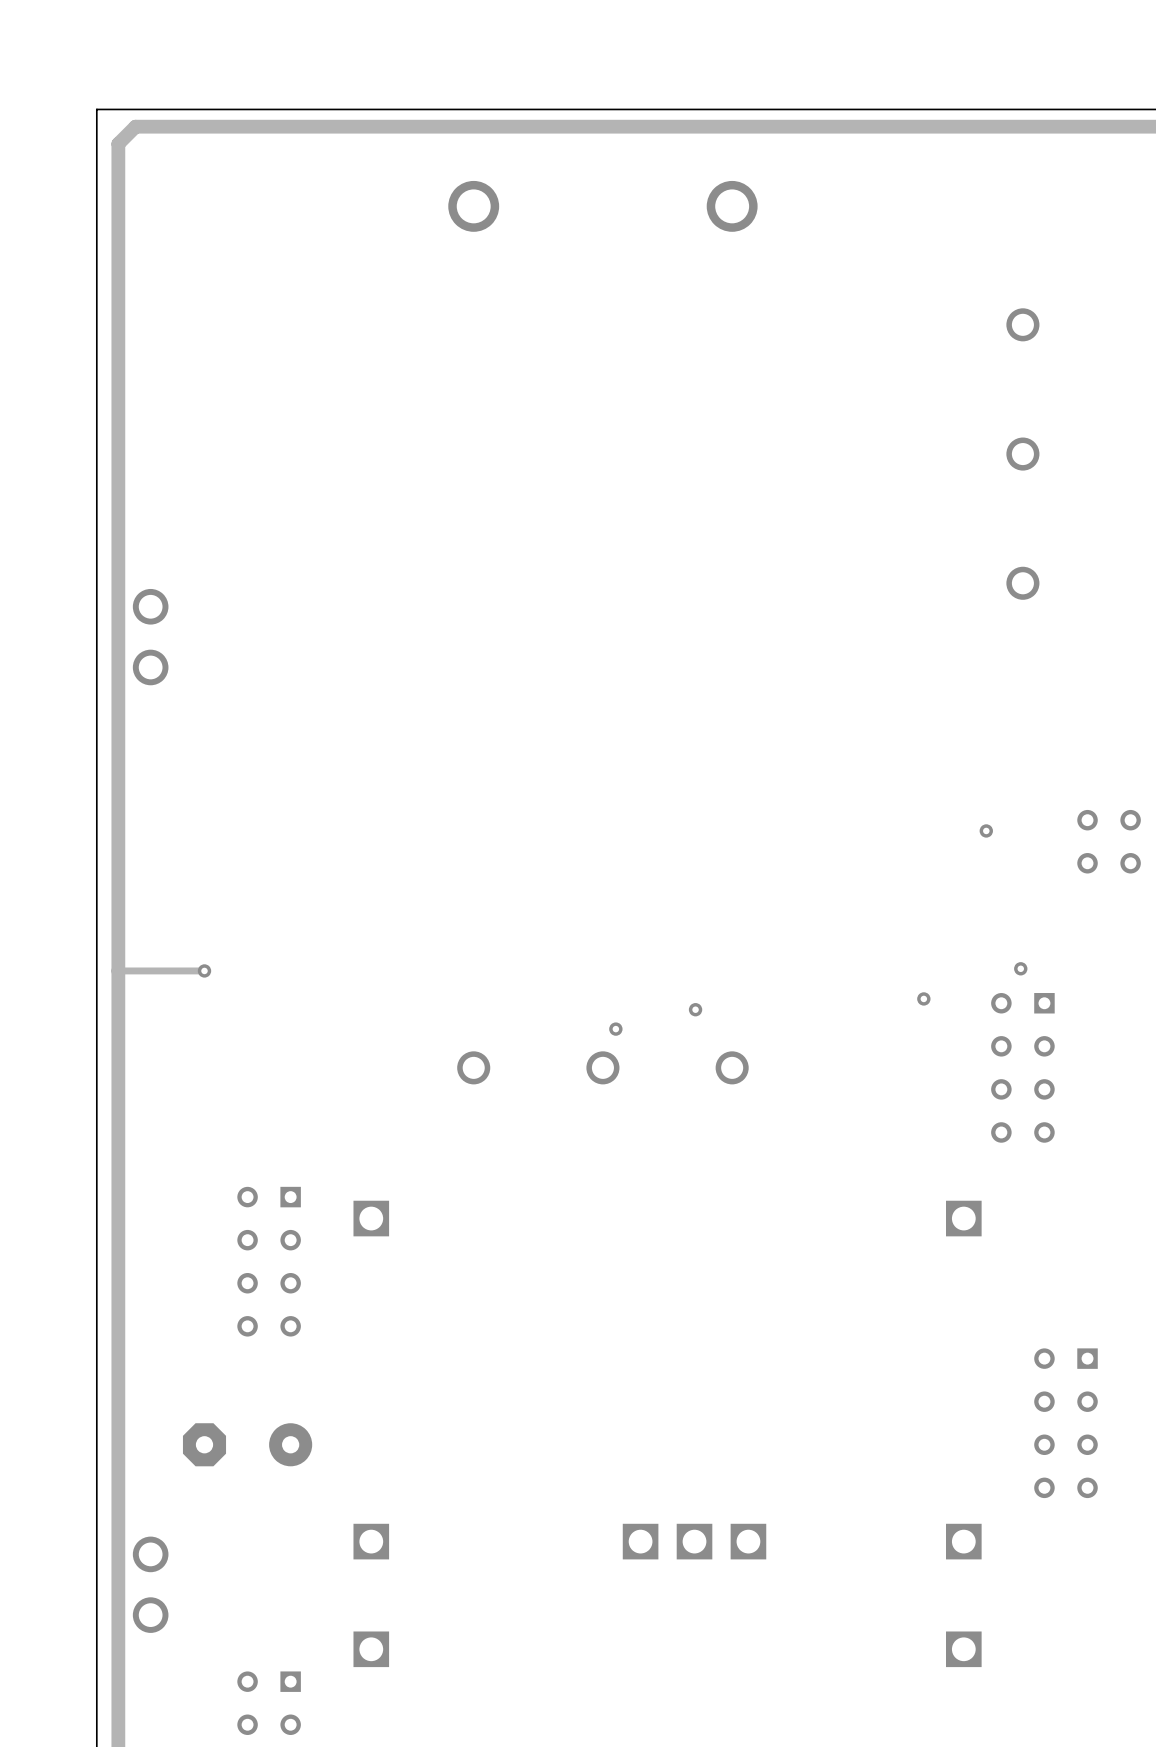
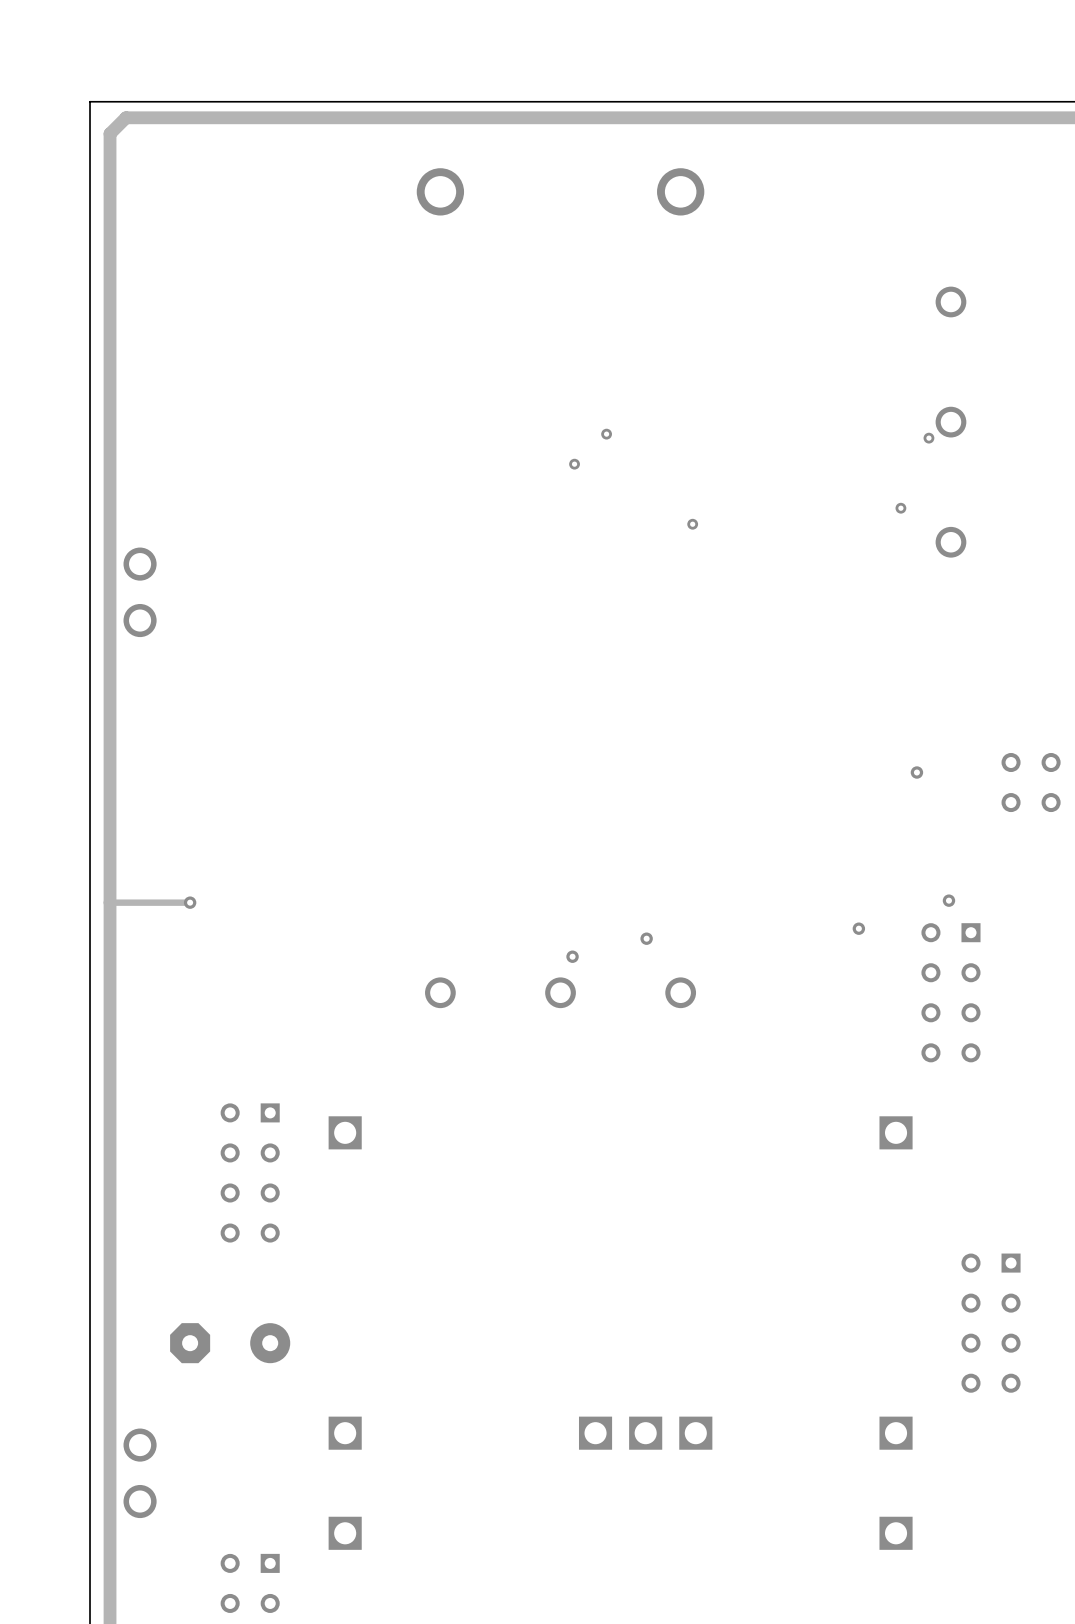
via: none -> (606, 434)
via: none -> (928, 438)
via: none -> (574, 464)
via: none -> (900, 508)
via: none -> (692, 524)

